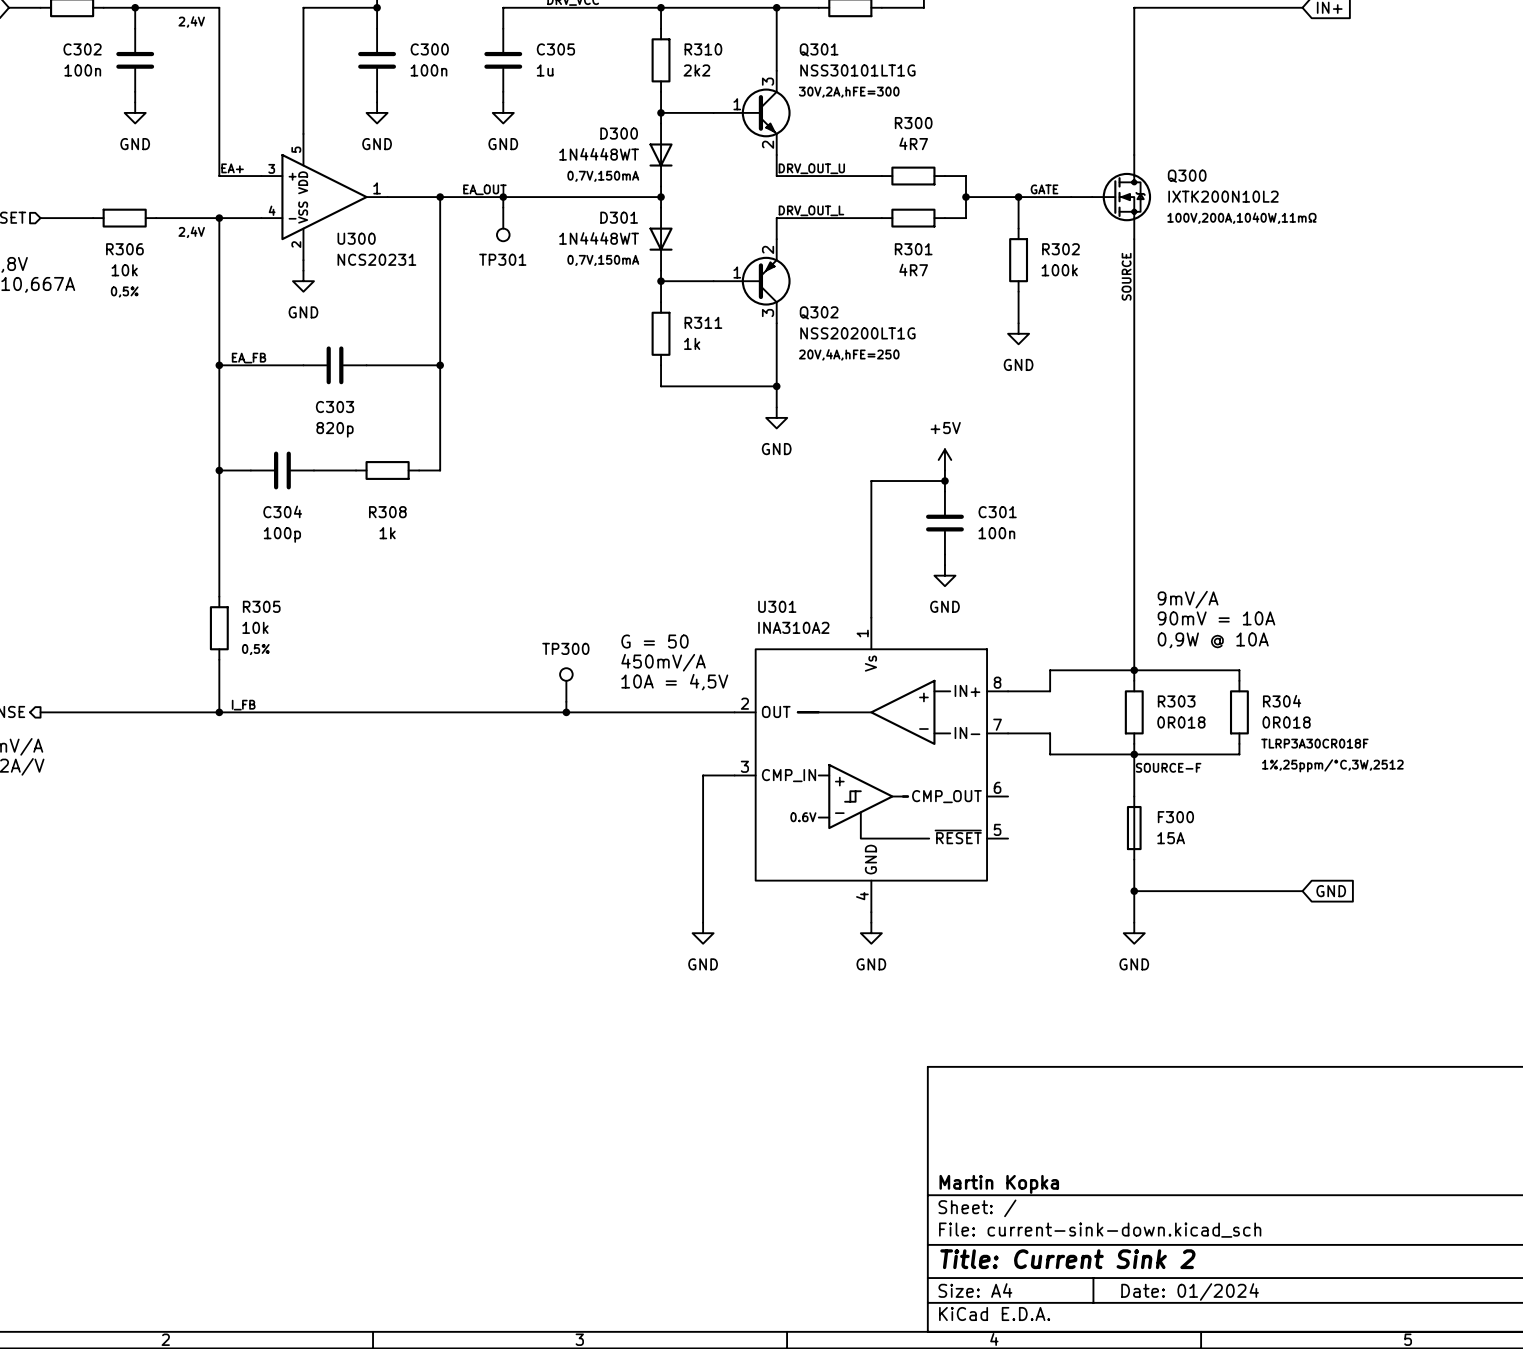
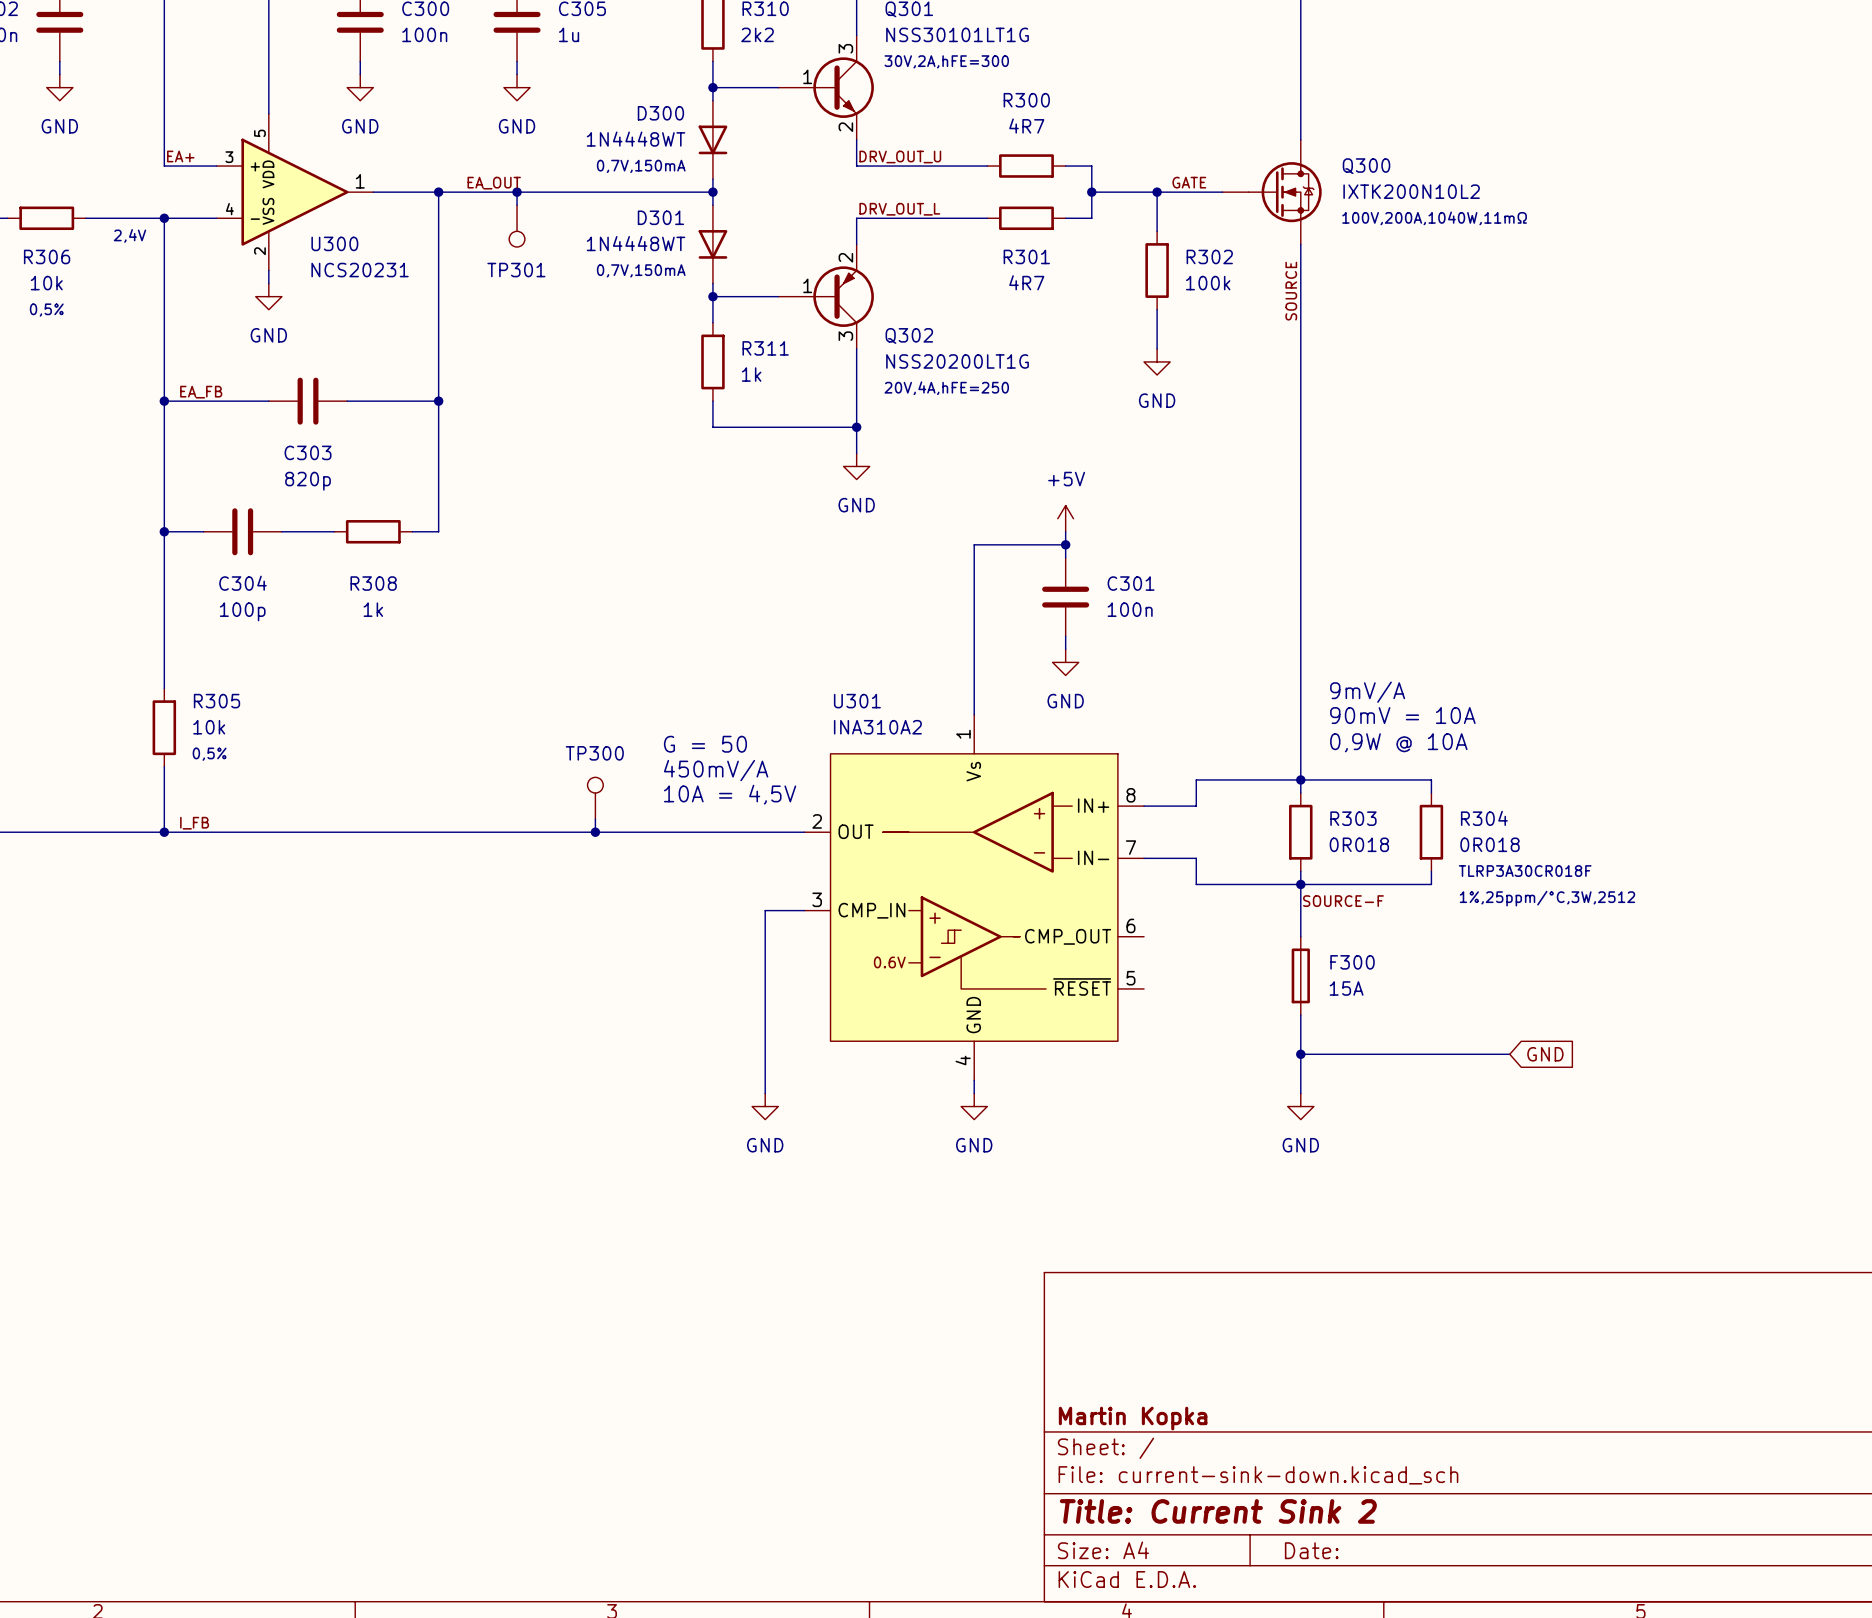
title block: Date: 01/2024 (1190, 1291) -> Date: (1311, 1550)

